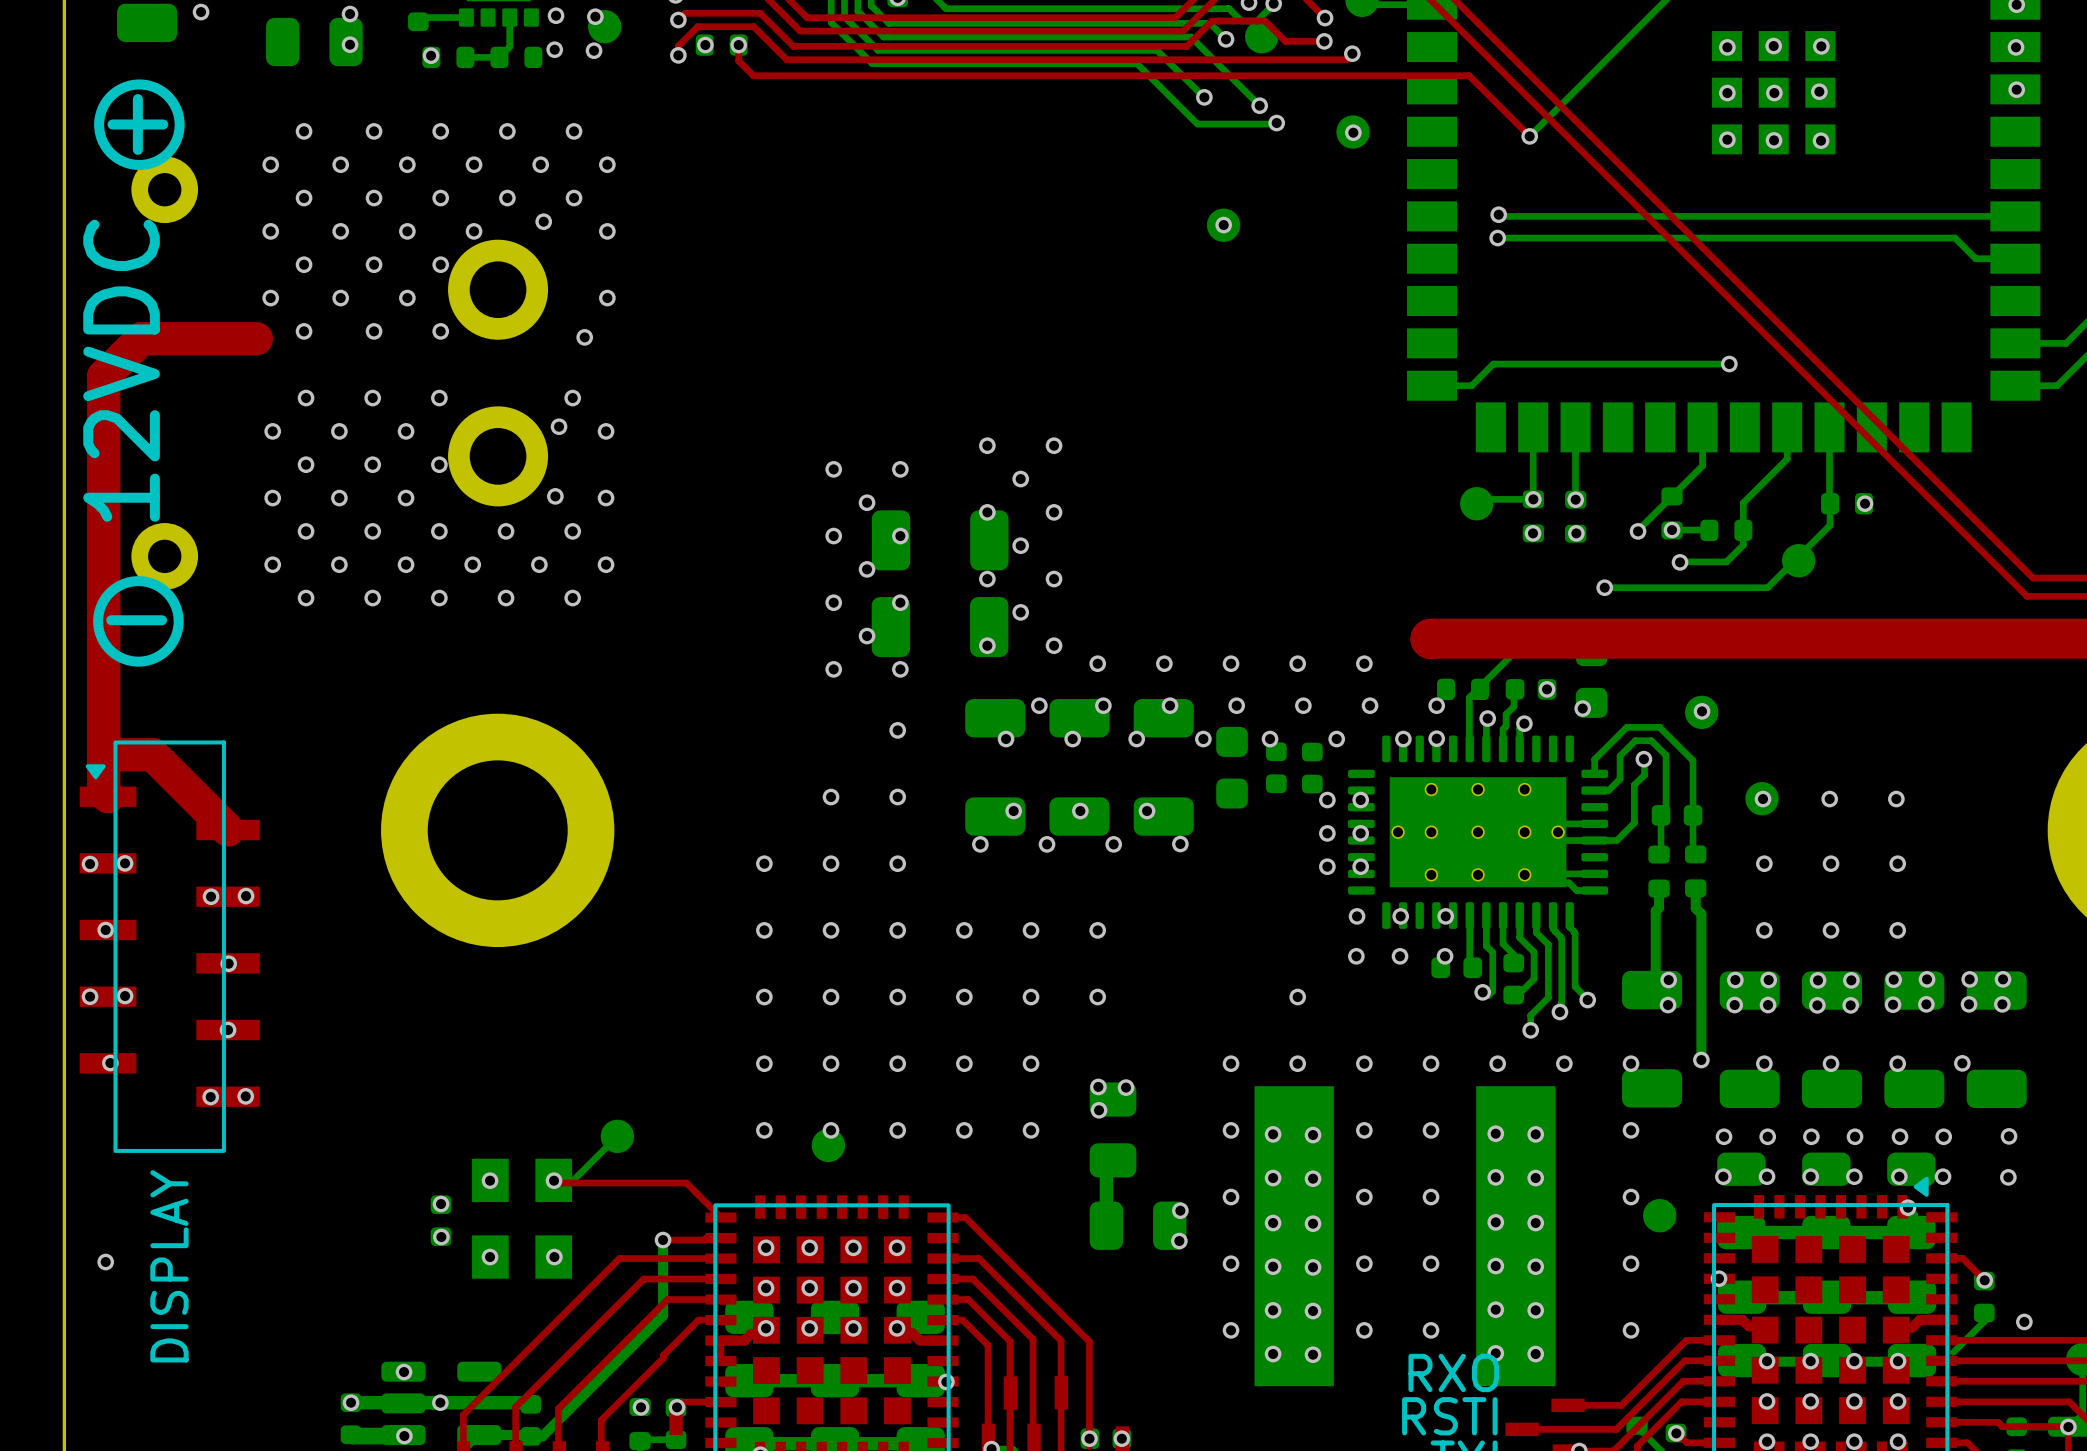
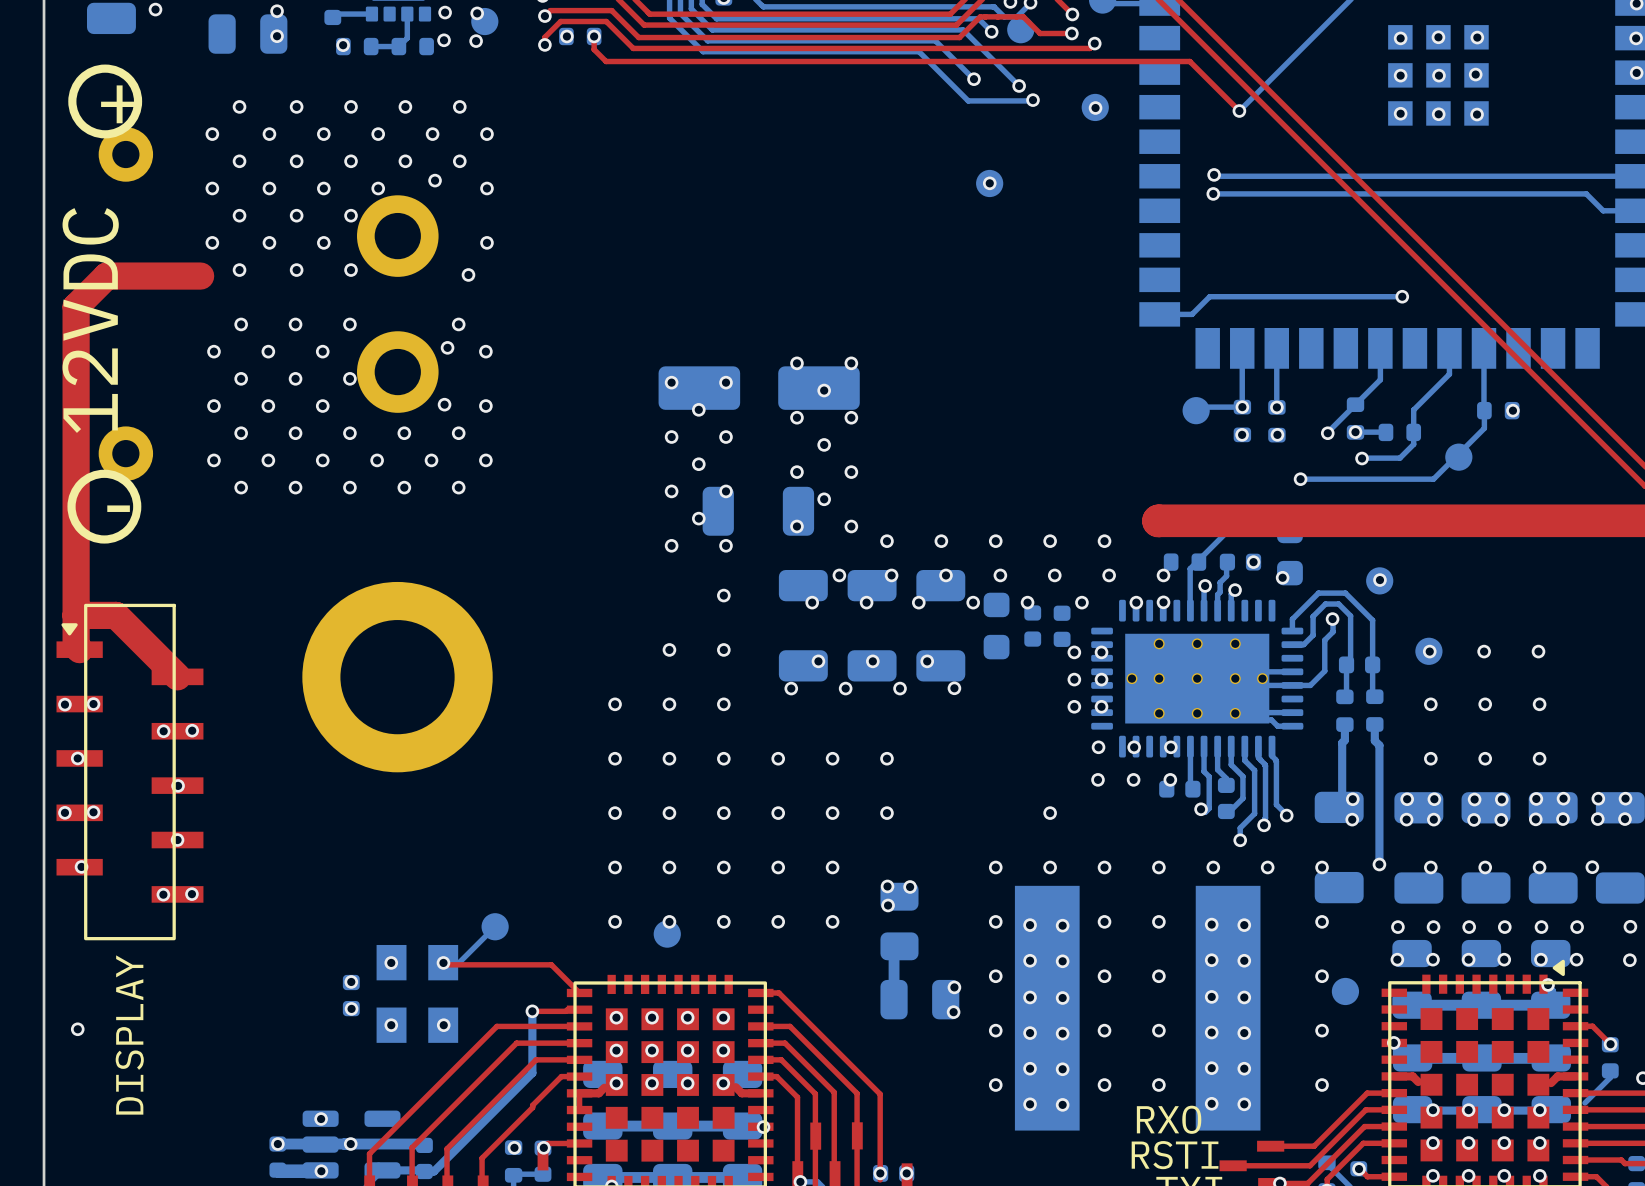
part: none -> (759, 388)
part: (940, 540) -> none

